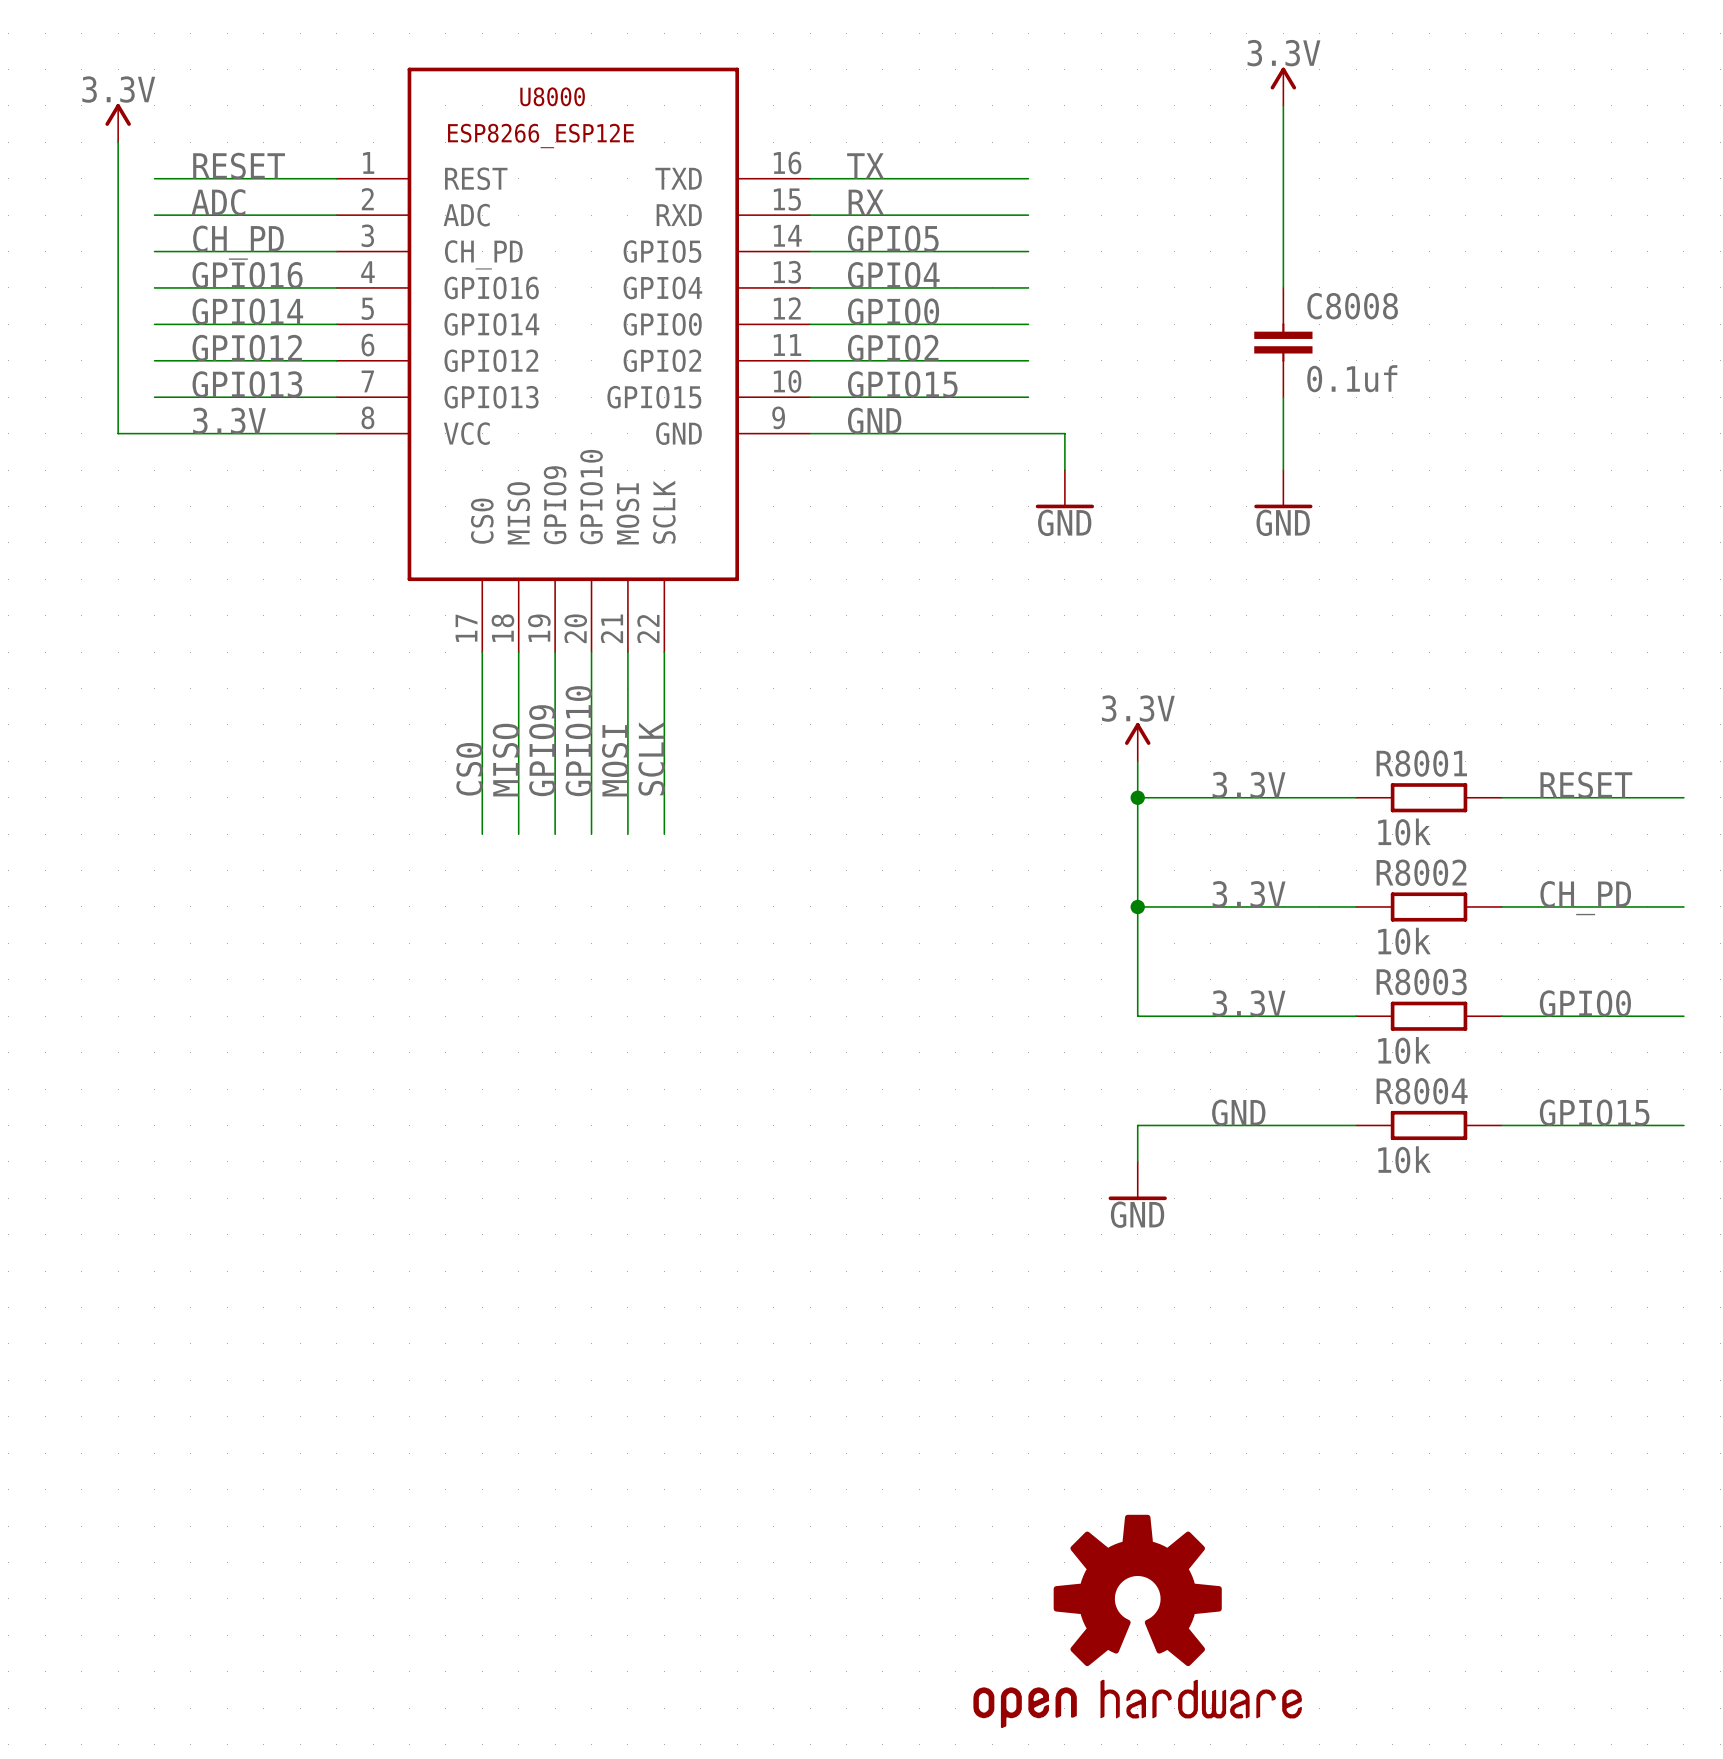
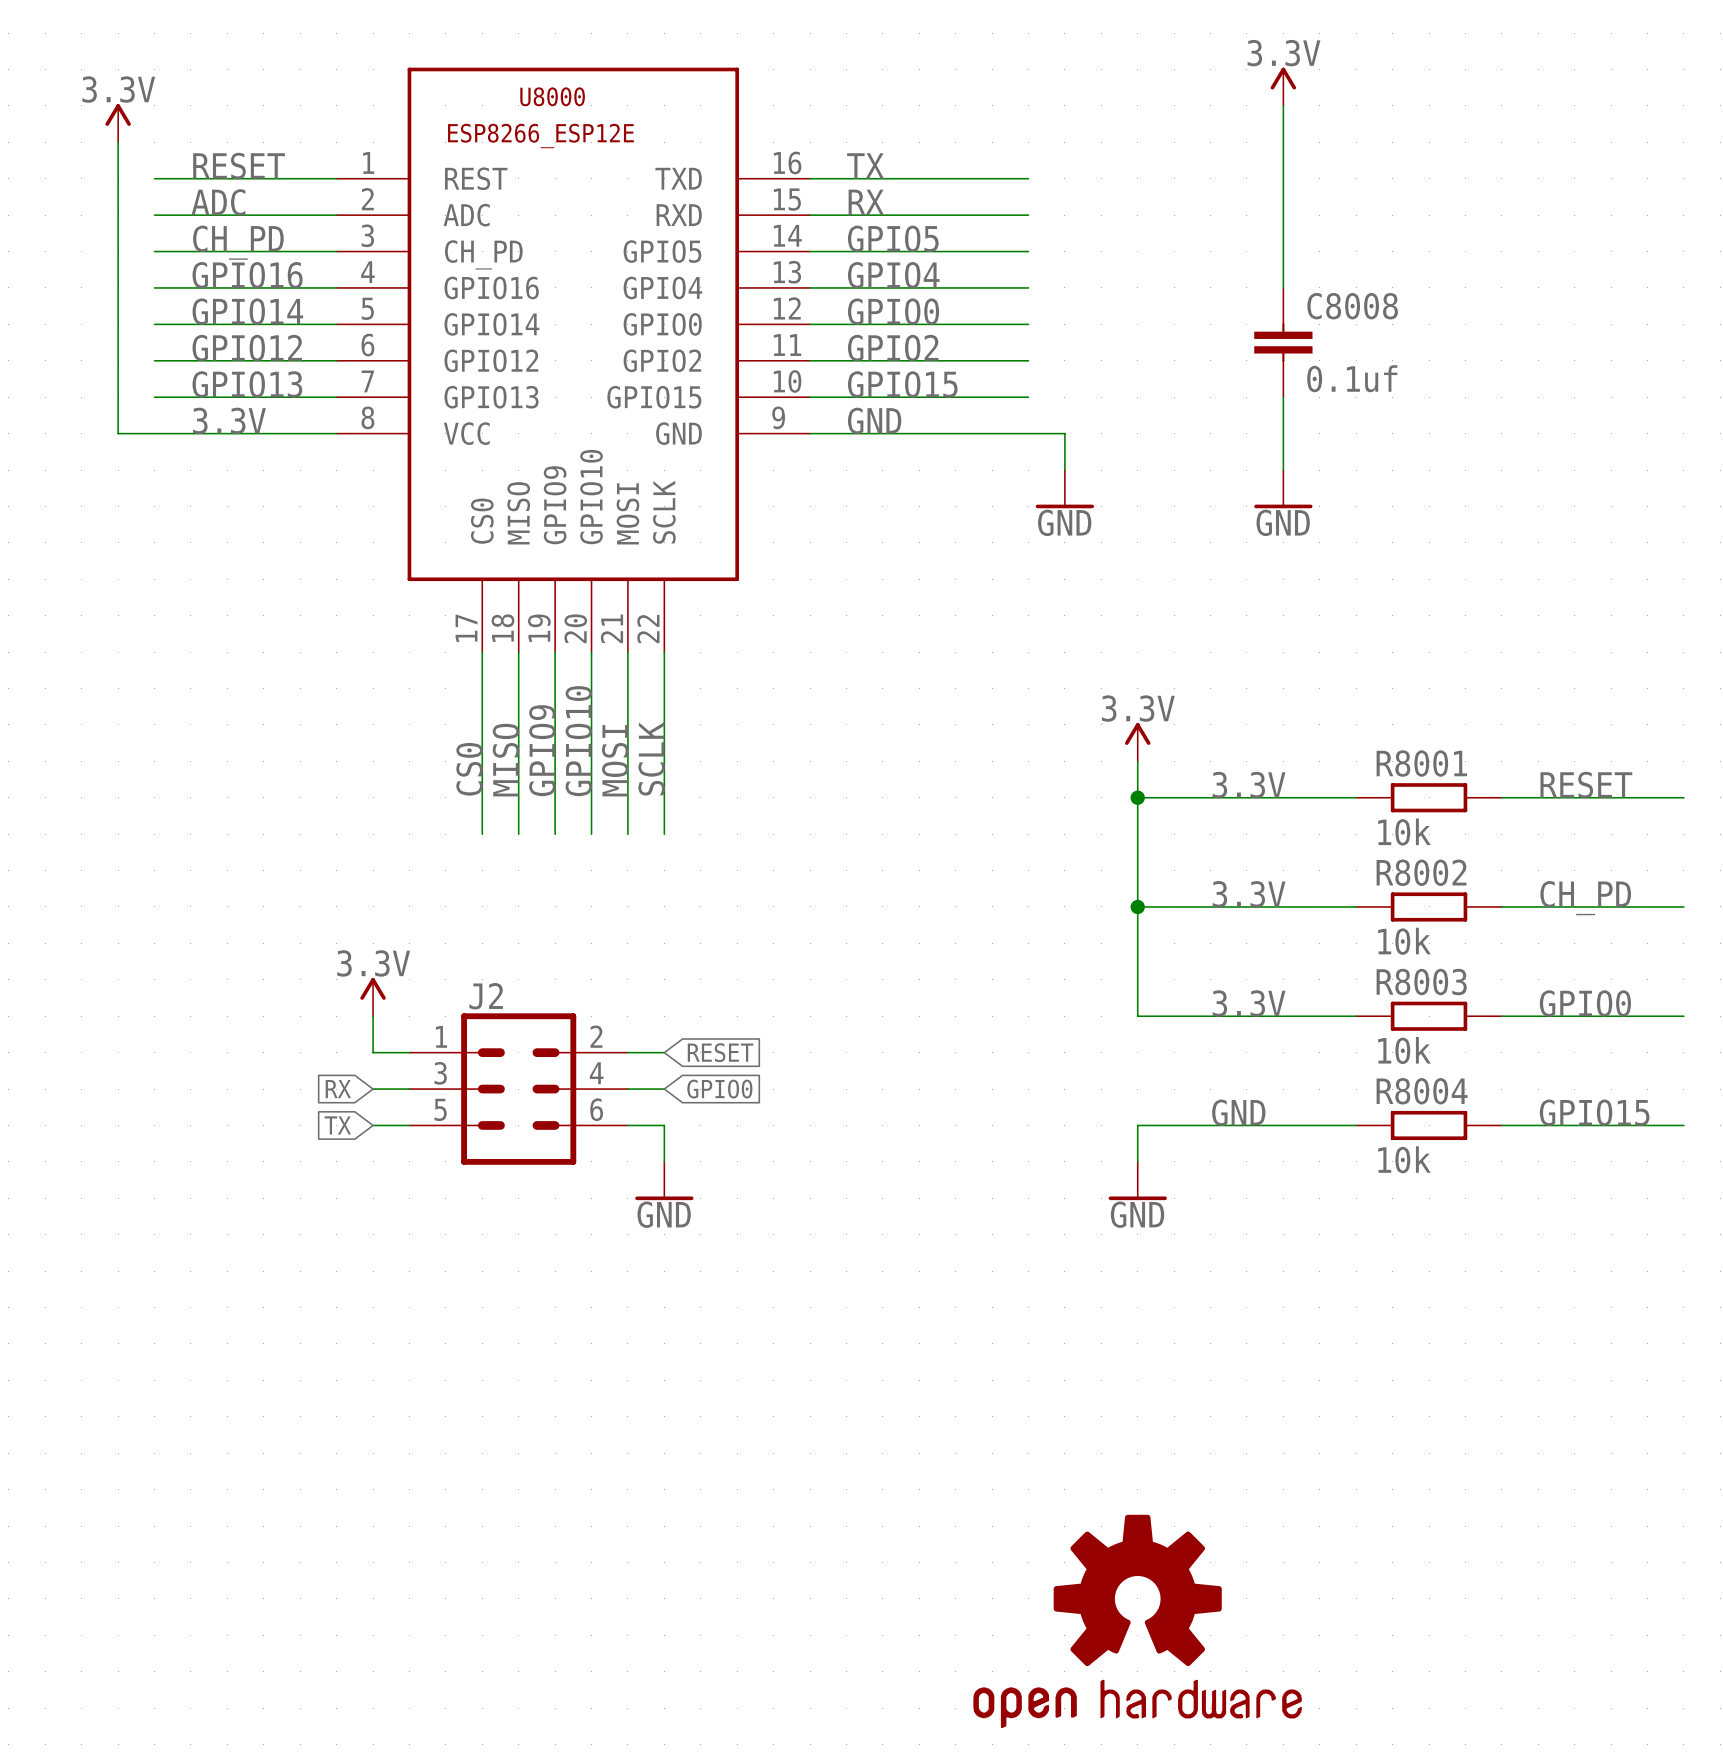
power symbol: none -> 3.3V (373, 997)
wire: none -> (373, 1016) (373, 1052) (409, 1052)
wire: none -> (627, 1052) (664, 1052)
global label: none -> RESET (720, 1052)
global label: none -> RX (338, 1089)
wire: none -> (373, 1089) (409, 1089)
J2: none -> (518, 1089)
wire: none -> (627, 1089) (664, 1089)
global label: none -> GPIO0 (719, 1089)
global label: none -> TX (337, 1125)
wire: none -> (373, 1125) (409, 1125)
wire: none -> (627, 1125) (664, 1125) (664, 1161)
power symbol: none -> GND (664, 1181)

